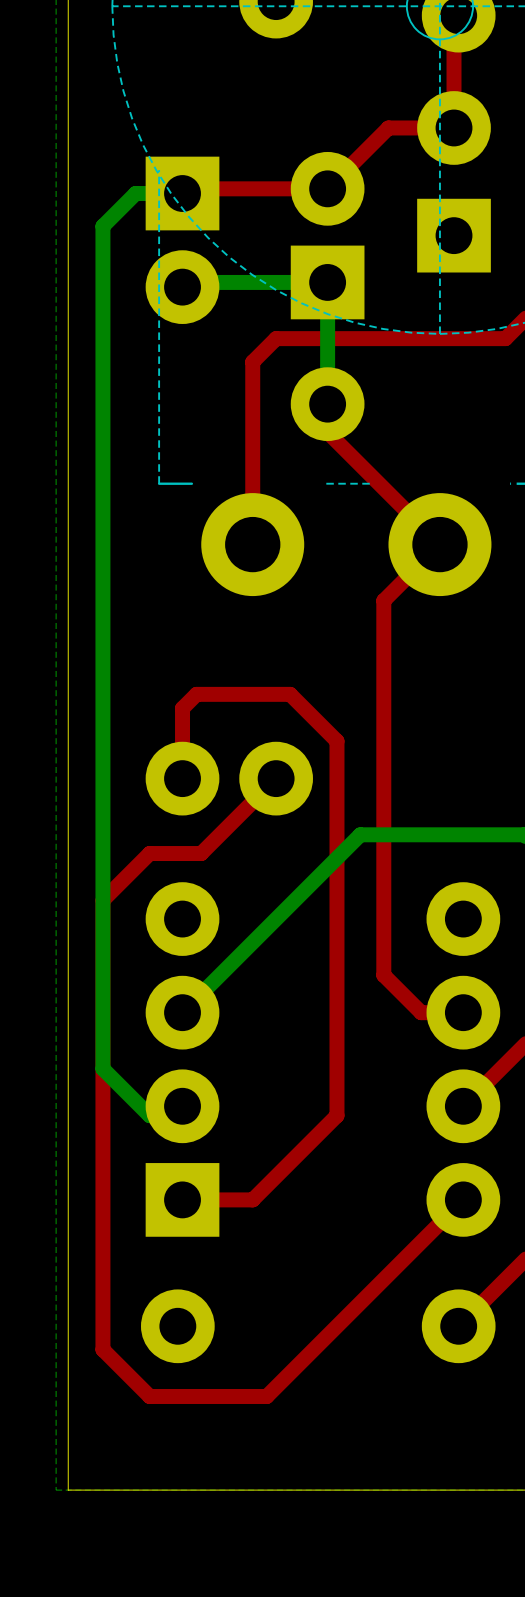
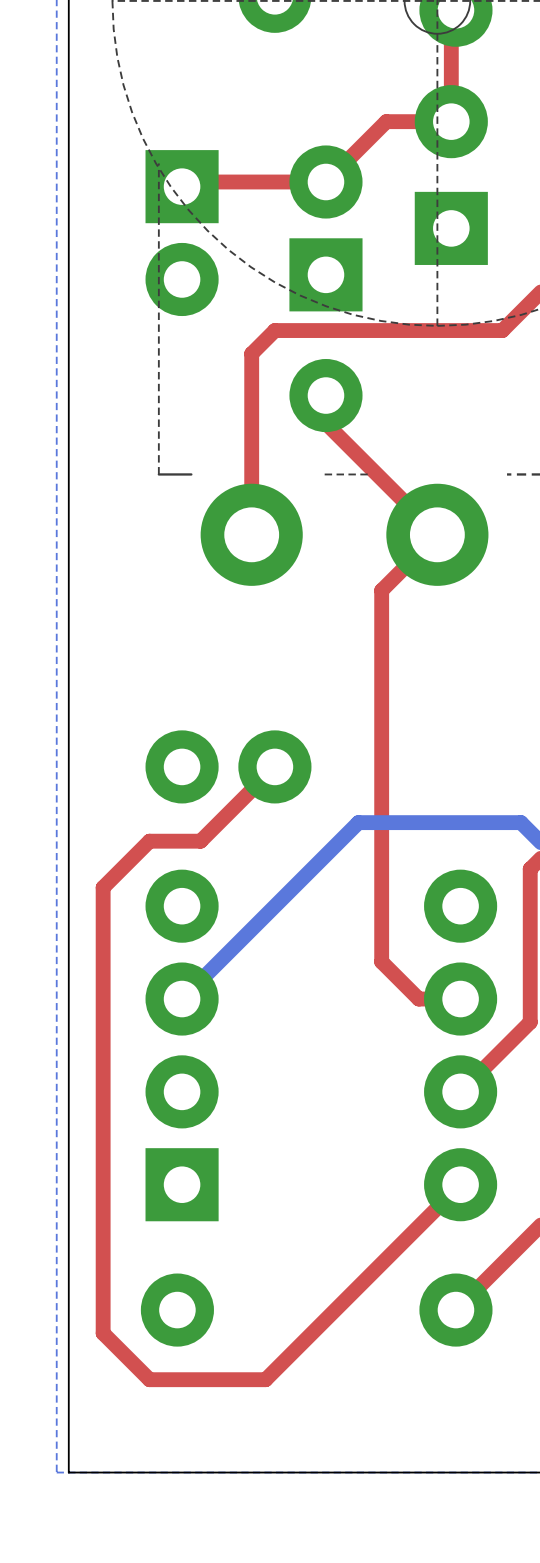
bottom track: (182, 193) (135, 193) (102, 226) (102, 1068) (149, 1115) (173, 1115) (182, 1106) -> none
bottom track: (182, 287) (187, 282) (327, 282) (327, 404) -> none
top track: (182, 778) (182, 708) (196, 694) (290, 694) (336, 741) (336, 1115) (252, 1199) (182, 1199) -> none

